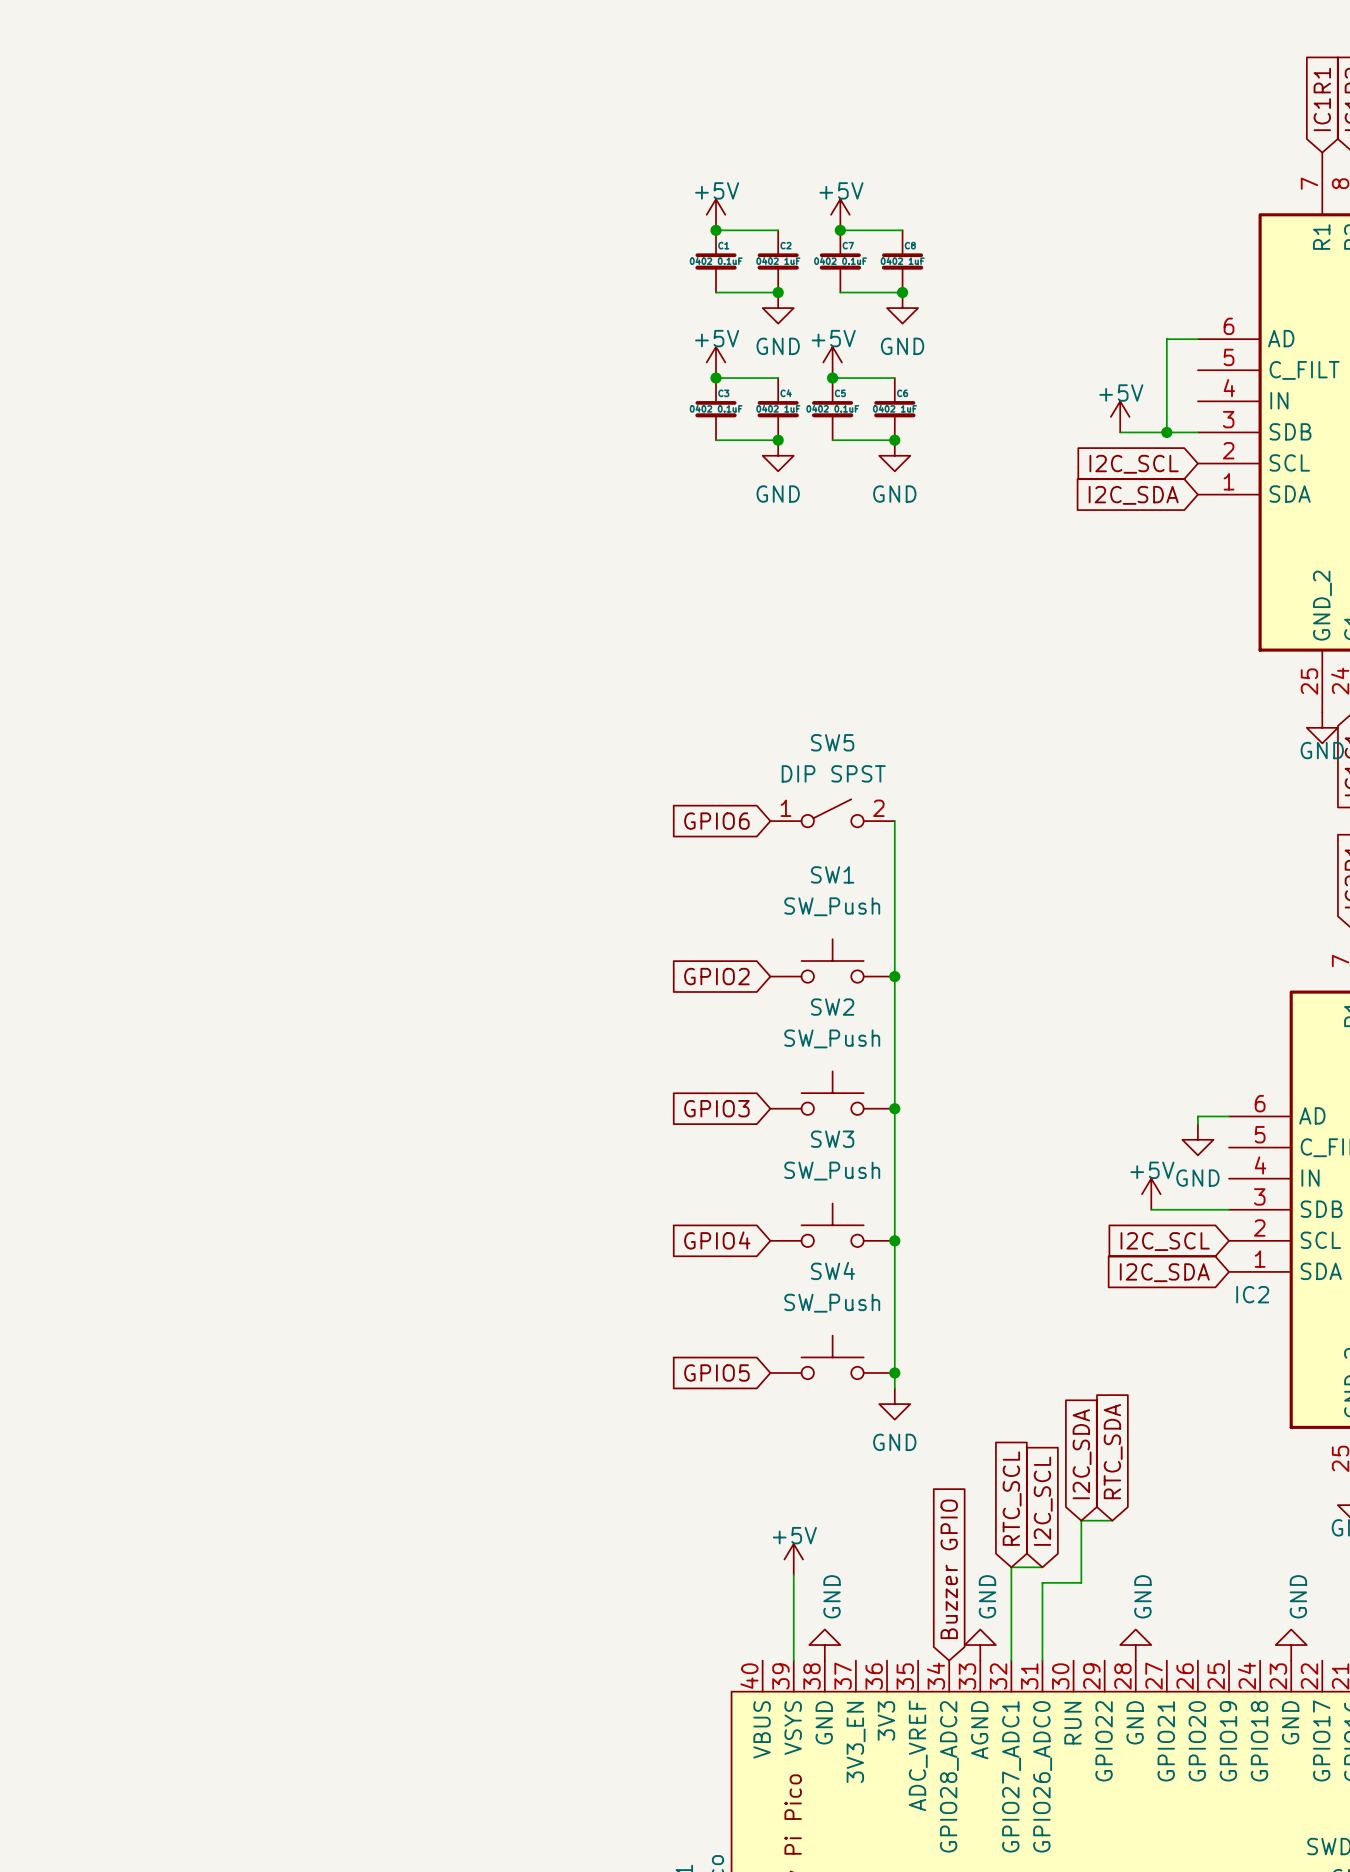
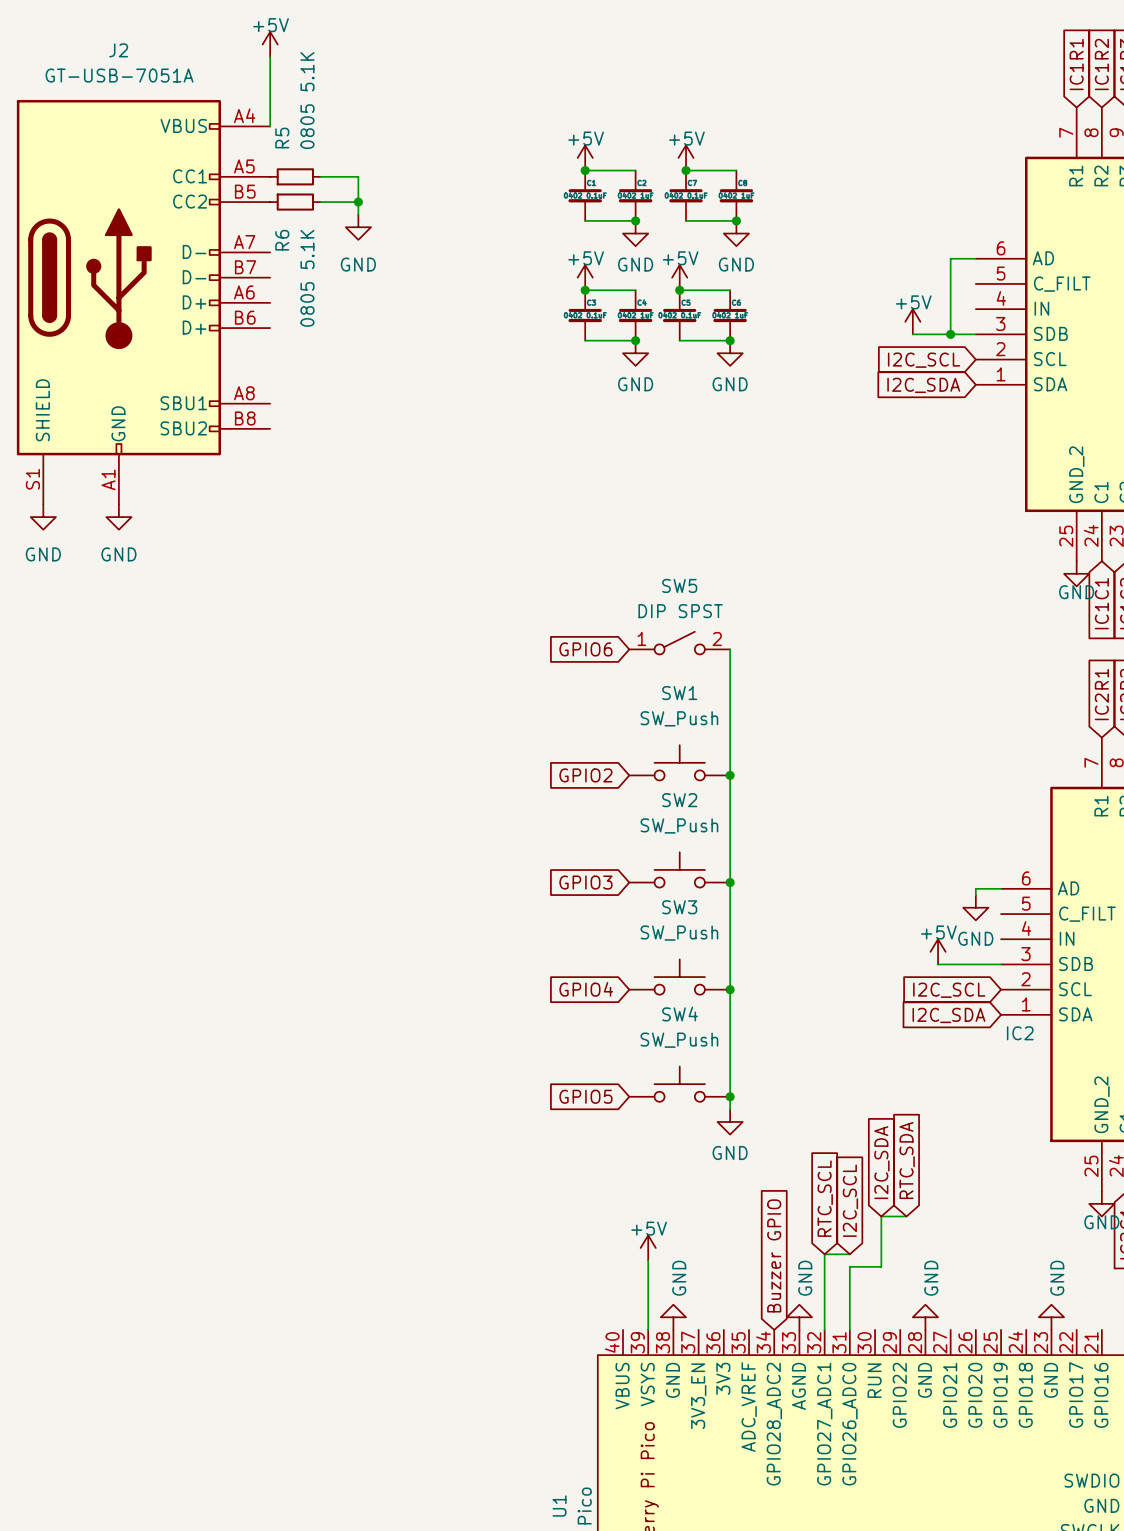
power symbol: none -> +5V (270, 44)
wire: none -> (270, 57) (270, 126)
R5: none -> 0805 5.1K (295, 176)
wire: none -> (320, 176) (358, 176) (358, 214)
R6: none -> 0805 5.1K (295, 202)
wire: none -> (320, 202) (358, 202)
junction: none -> (358, 202)
power symbol: none -> GND (358, 227)
J2: none -> GT-USB-7051A (143, 302)
power symbol: none -> GND (43, 517)
power symbol: none -> GND (118, 517)

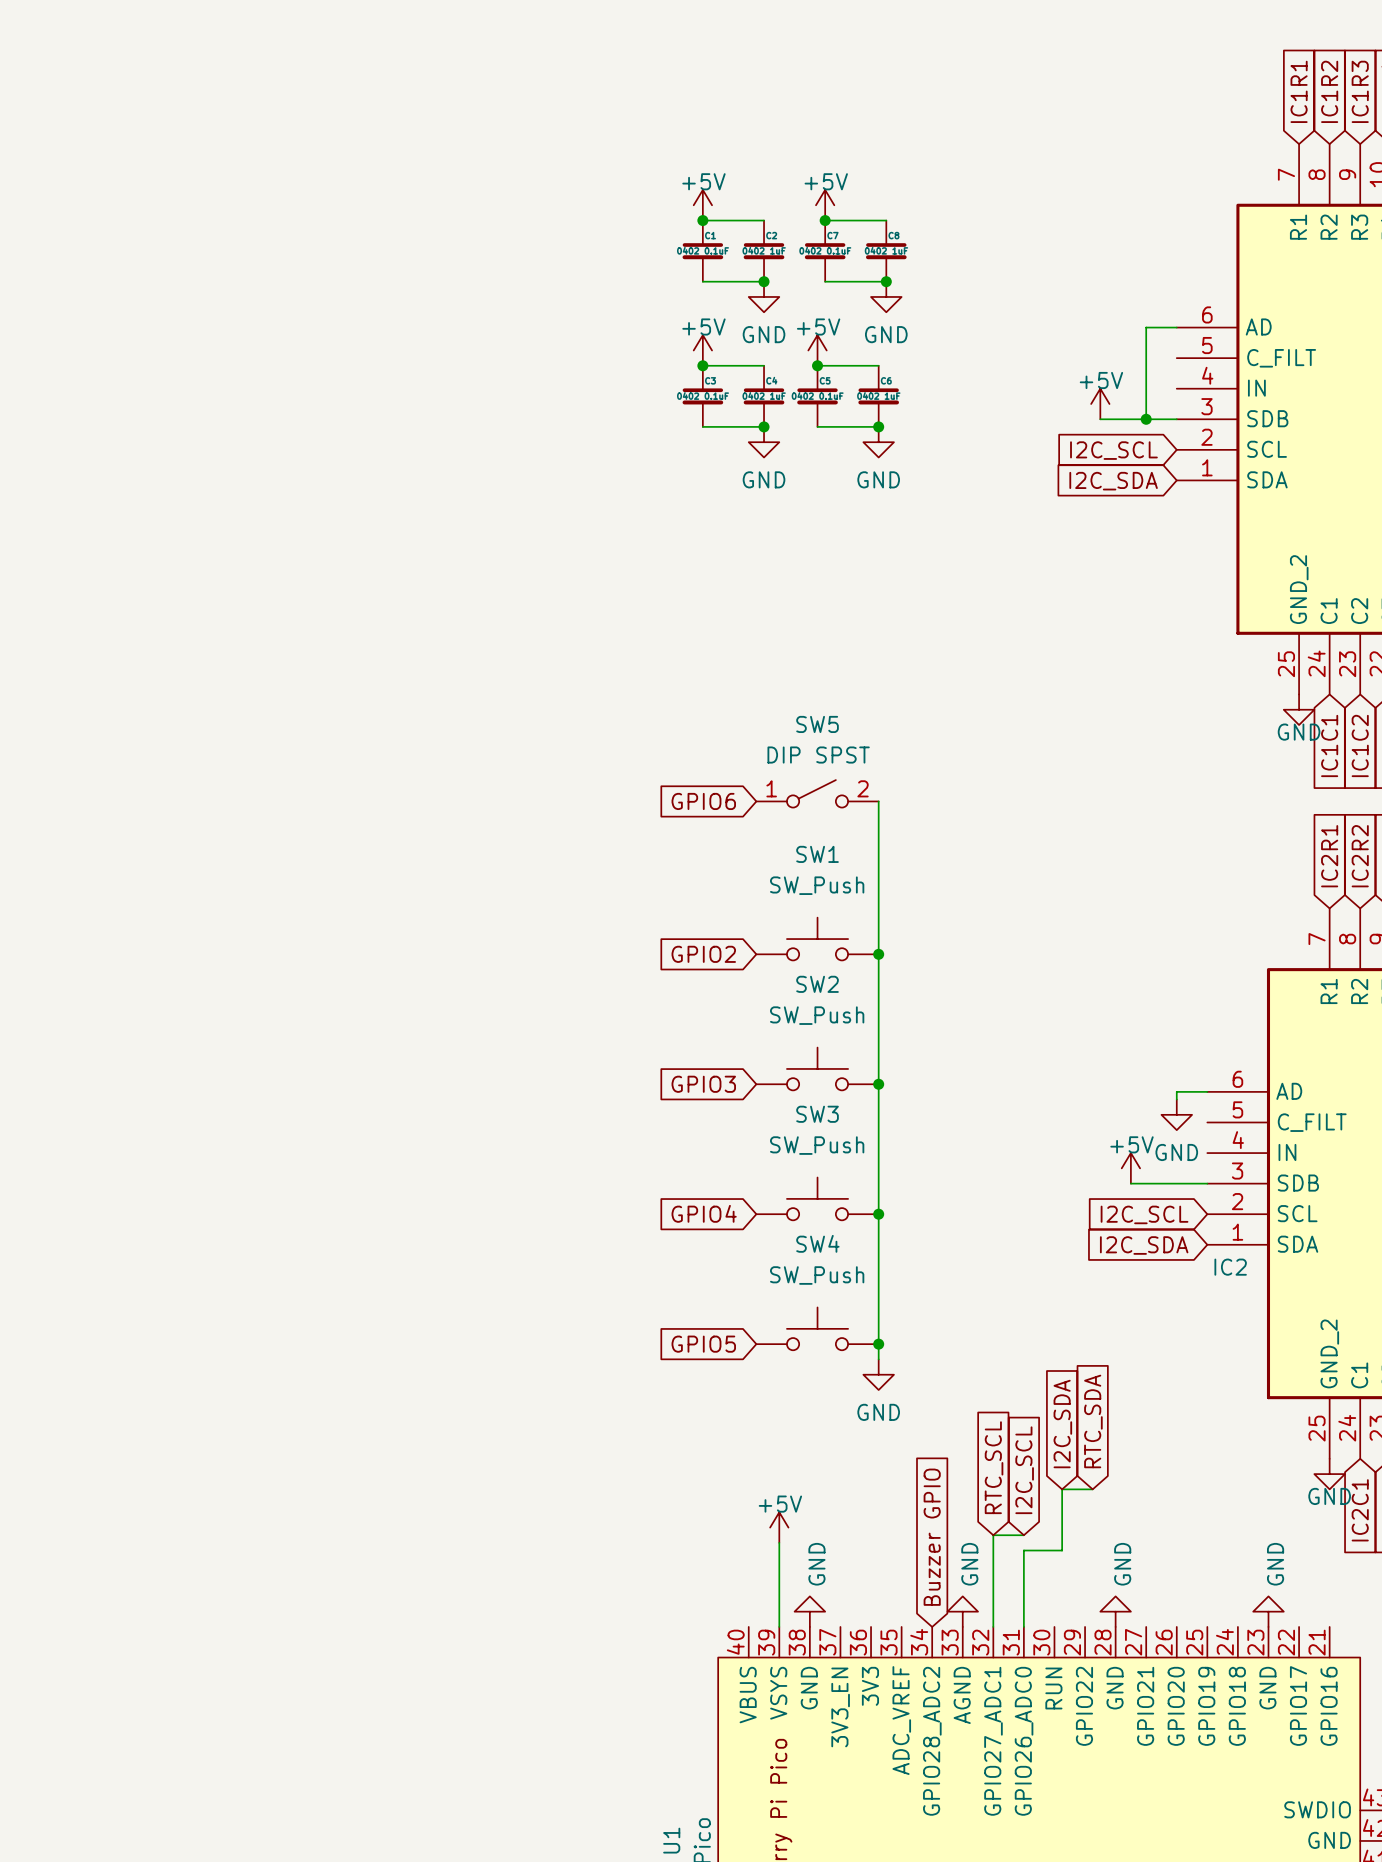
power symbol: +5V (270, 44) -> none
wire: (270, 57) (270, 126) -> none
R5: 0805 5.1K (295, 176) -> none
wire: (320, 176) (358, 176) (358, 214) -> none
R6: 0805 5.1K (295, 202) -> none
wire: (320, 202) (358, 202) -> none
junction: (358, 202) -> none
power symbol: GND (358, 227) -> none
J2: GT-USB-7051A (143, 302) -> none
power symbol: GND (43, 517) -> none
power symbol: GND (118, 517) -> none

